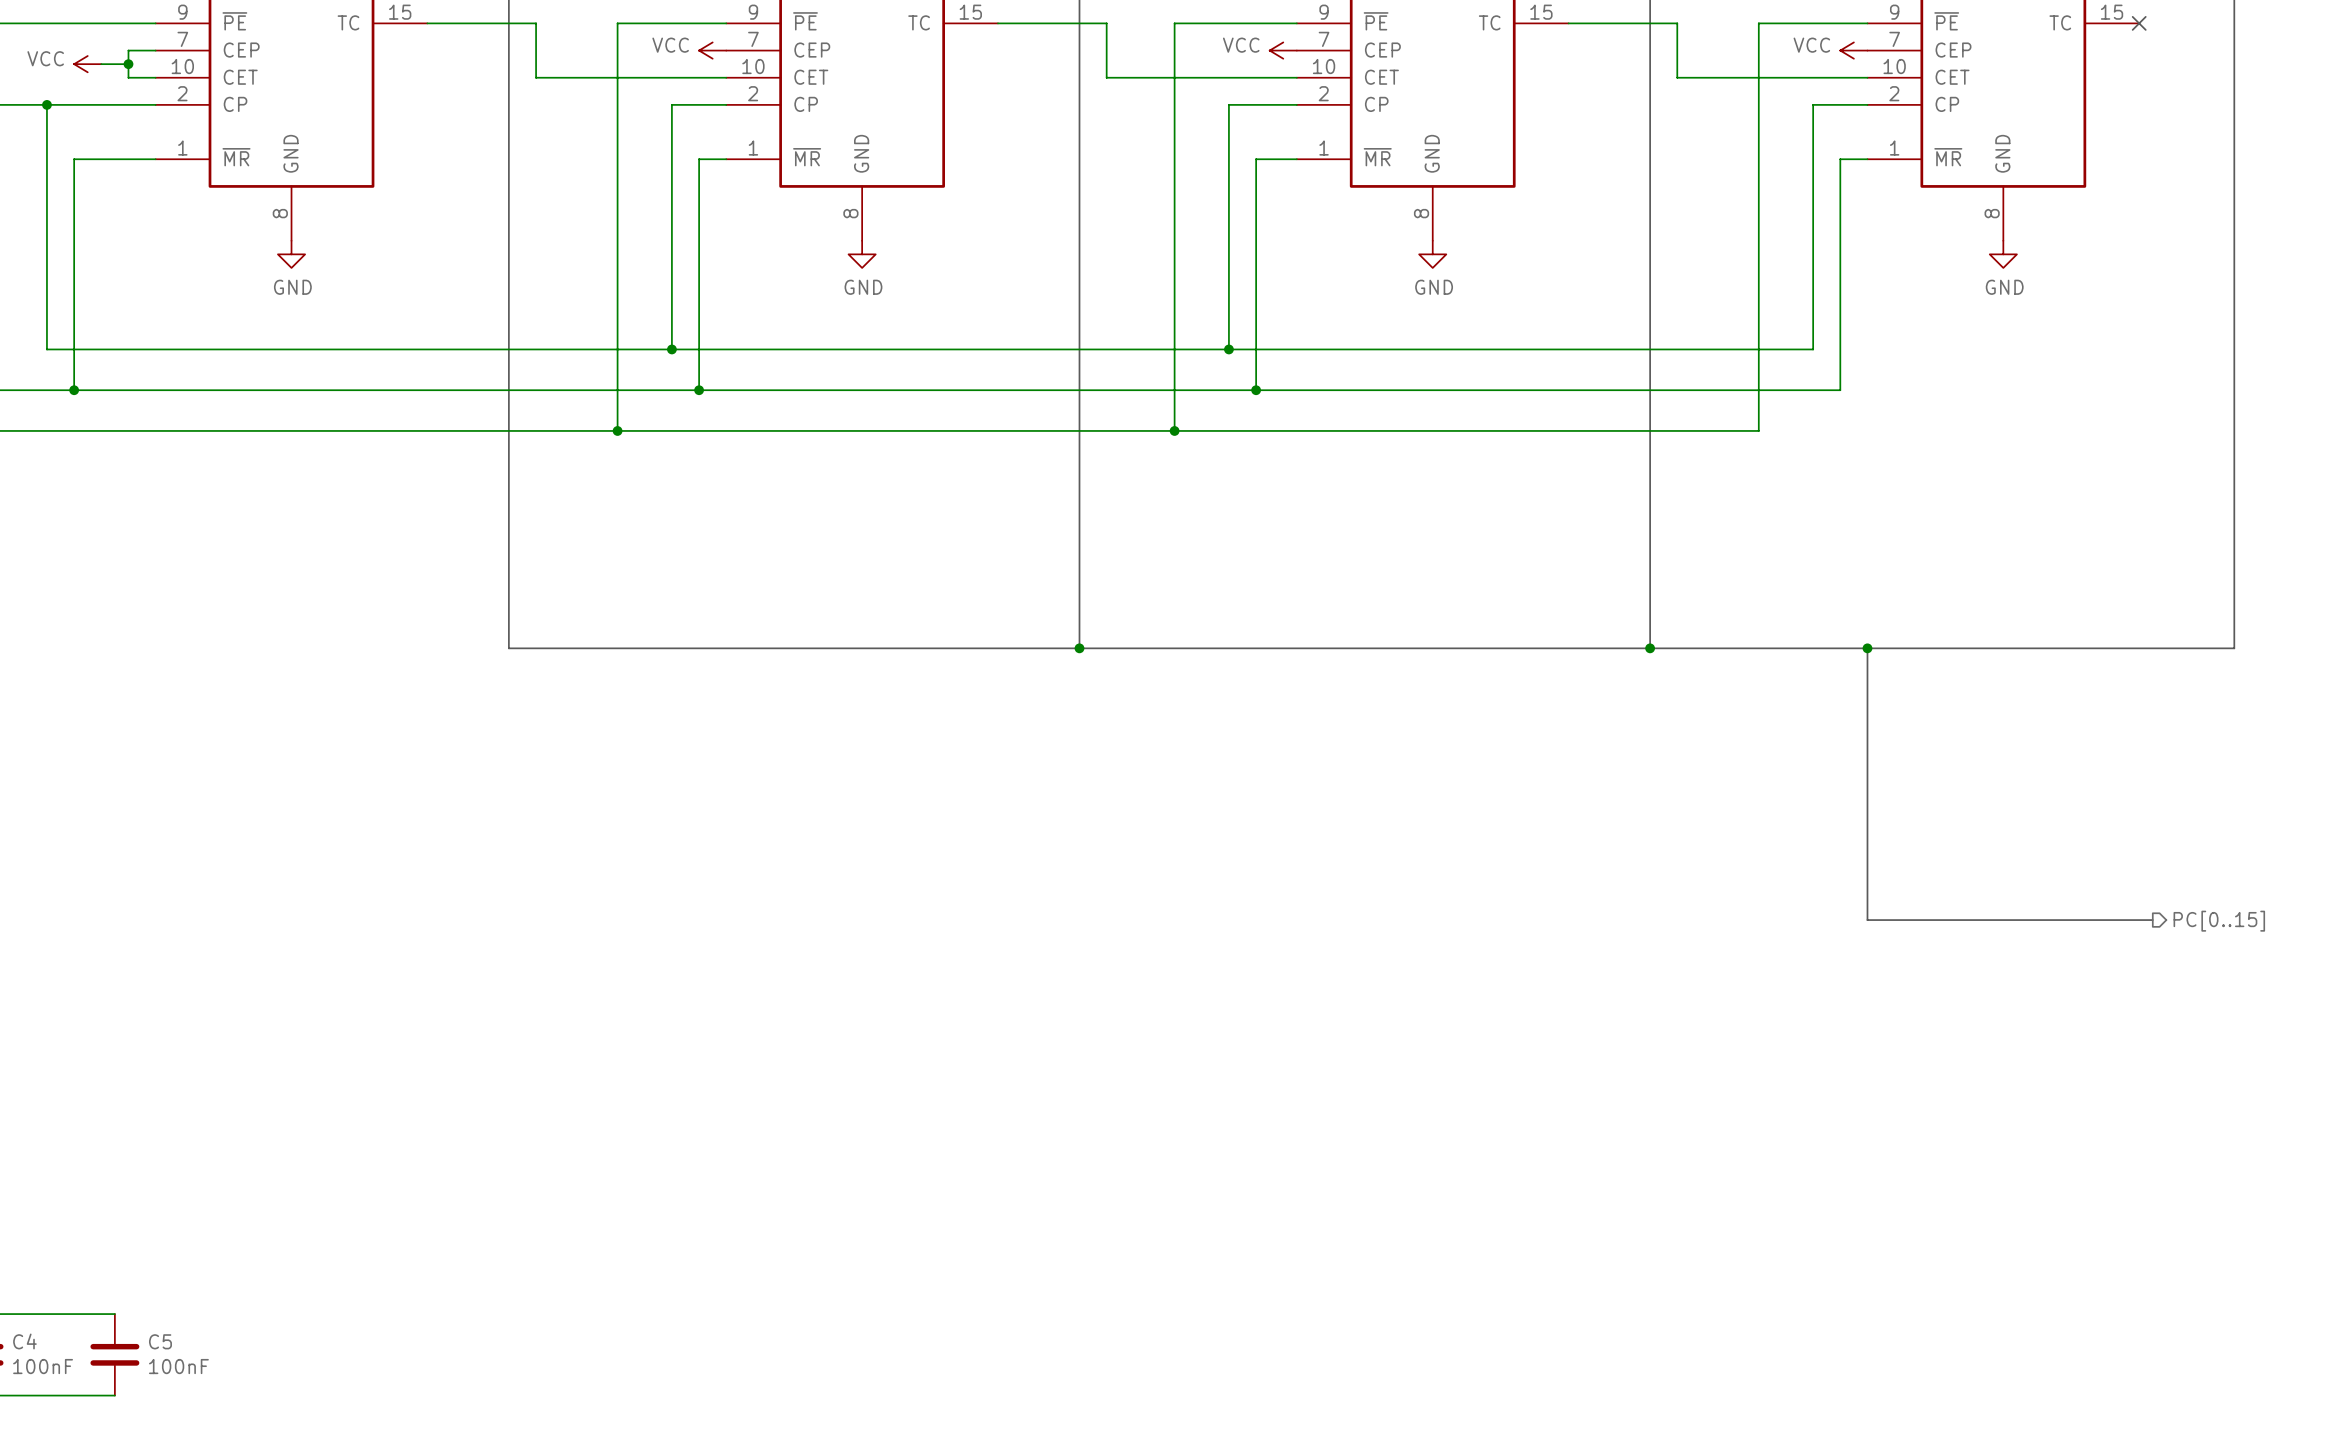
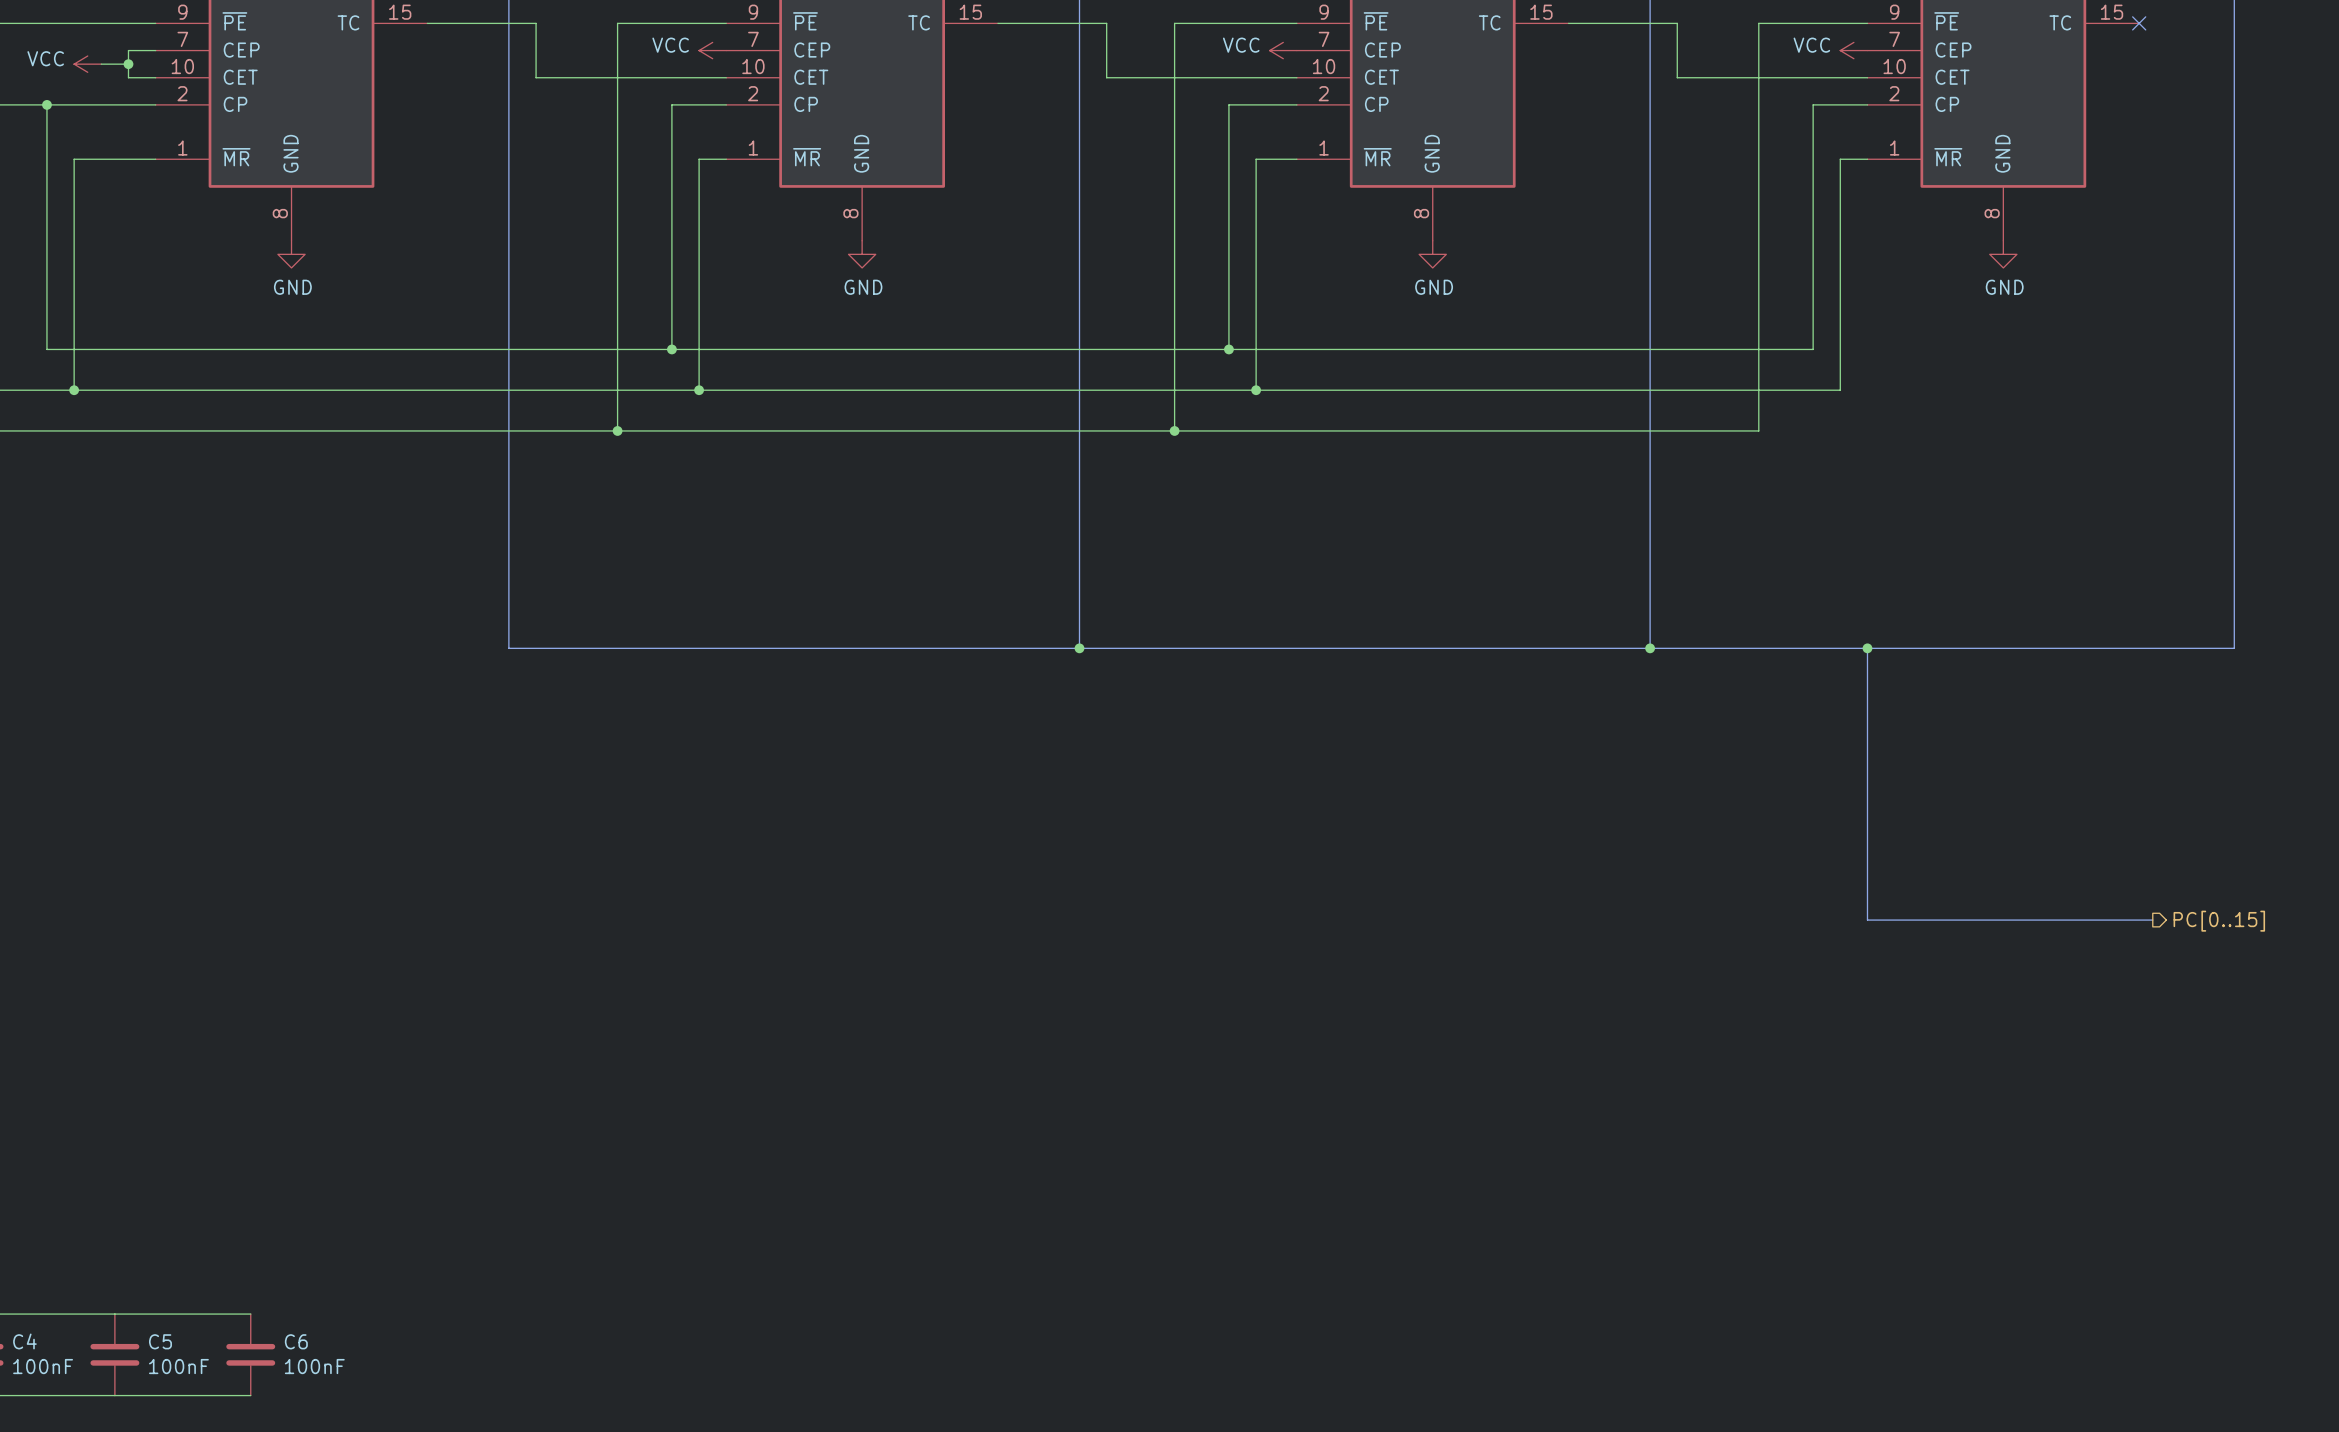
wire: none -> (114, 1314) (250, 1314)
C6: none -> 100nF (250, 1354)
wire: none -> (114, 1395) (250, 1395)

